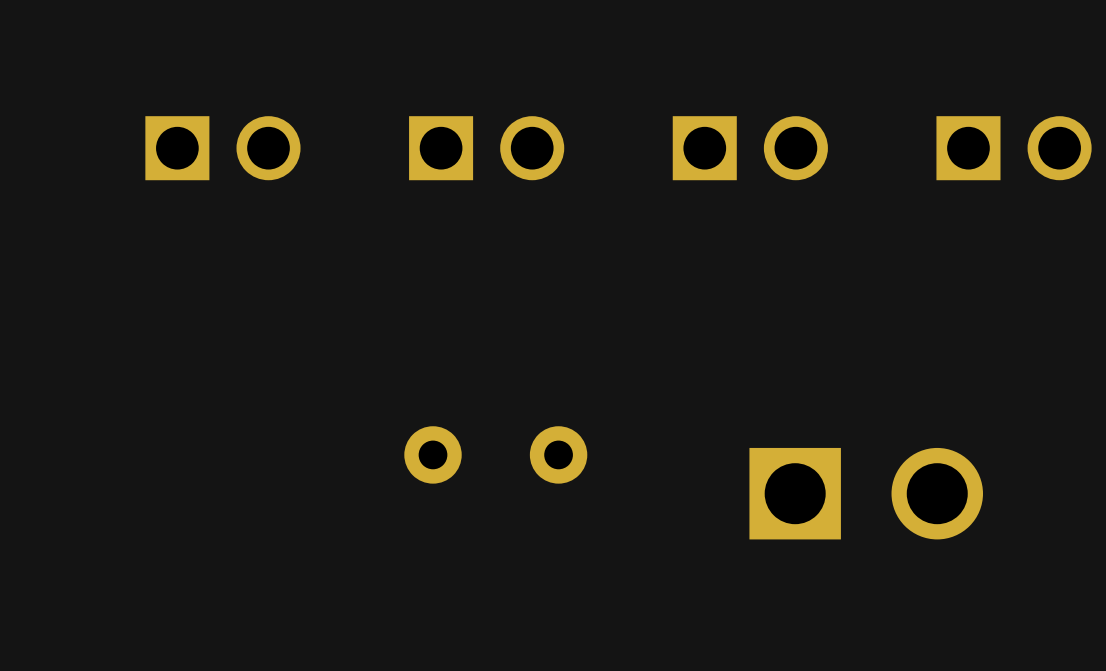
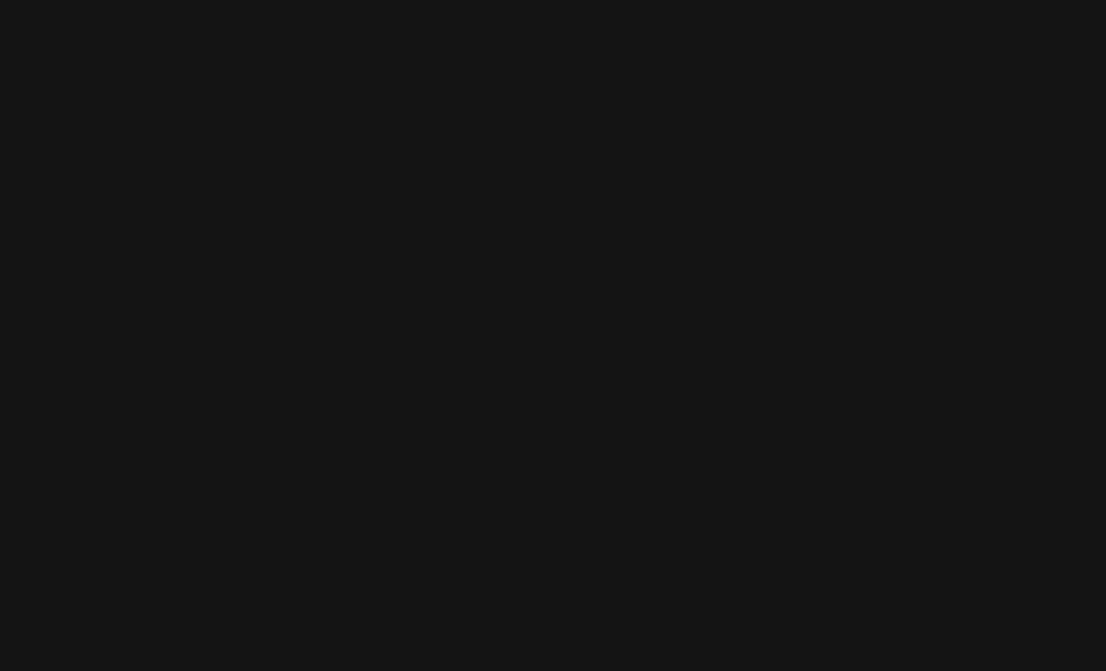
part: (222, 148) -> none
part: (486, 148) -> none
part: (750, 148) -> none
part: (1014, 148) -> none
part: (495, 454) -> none
part: (866, 493) -> none

